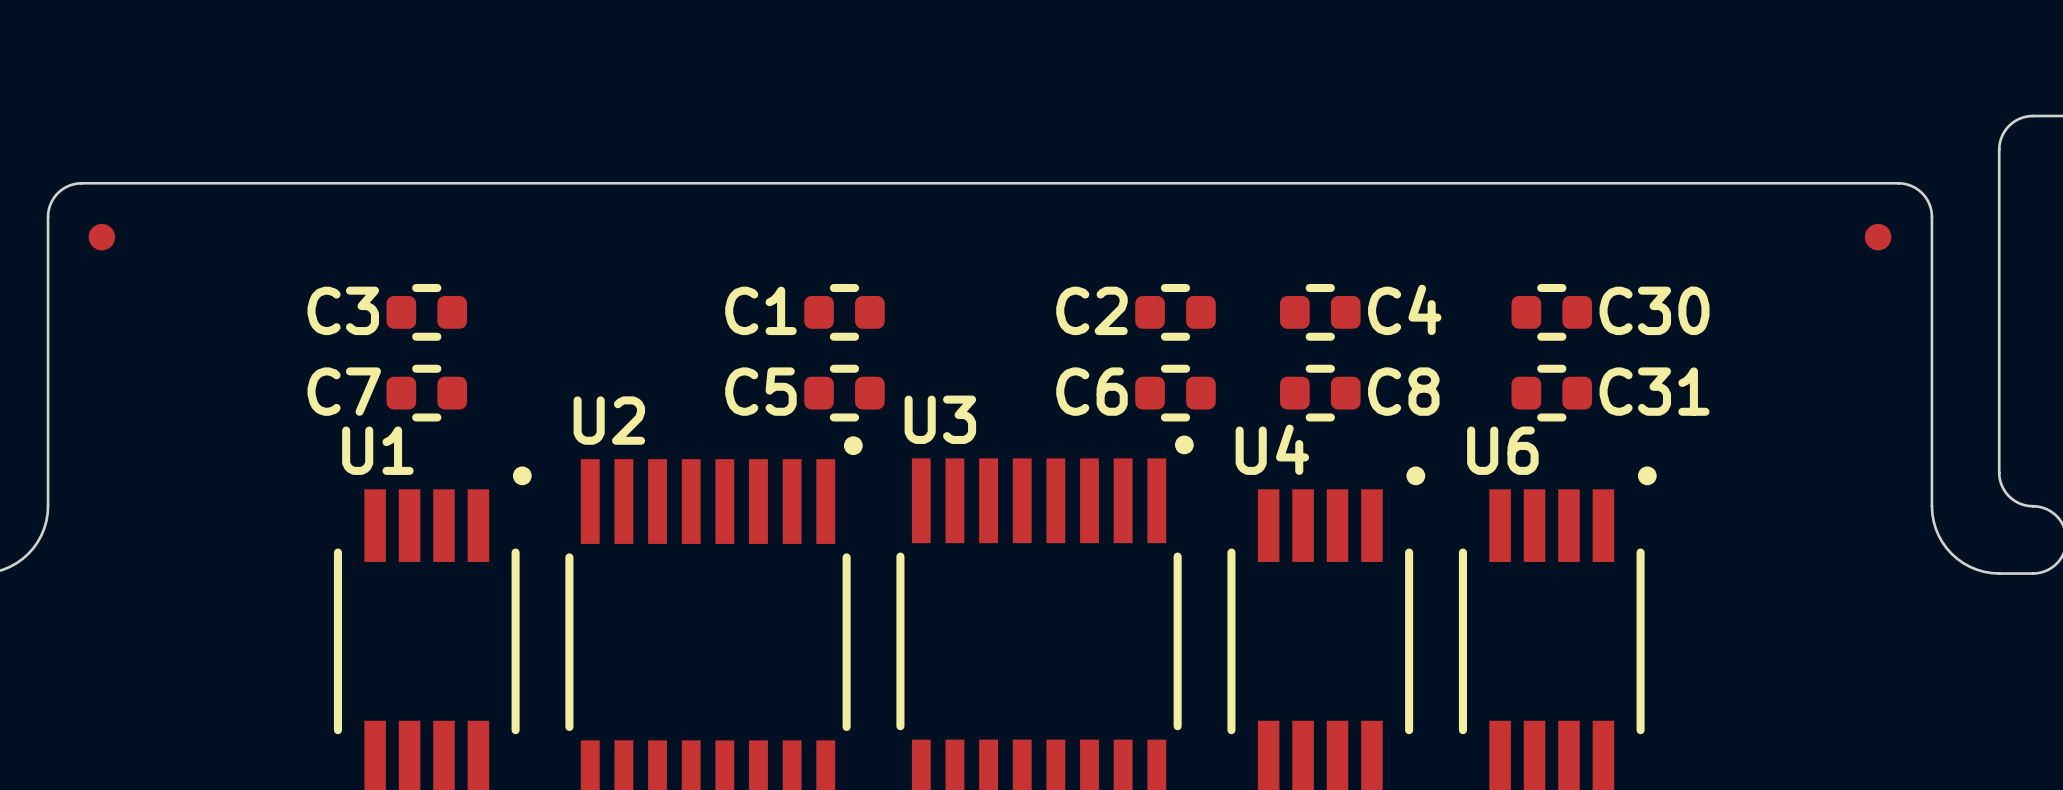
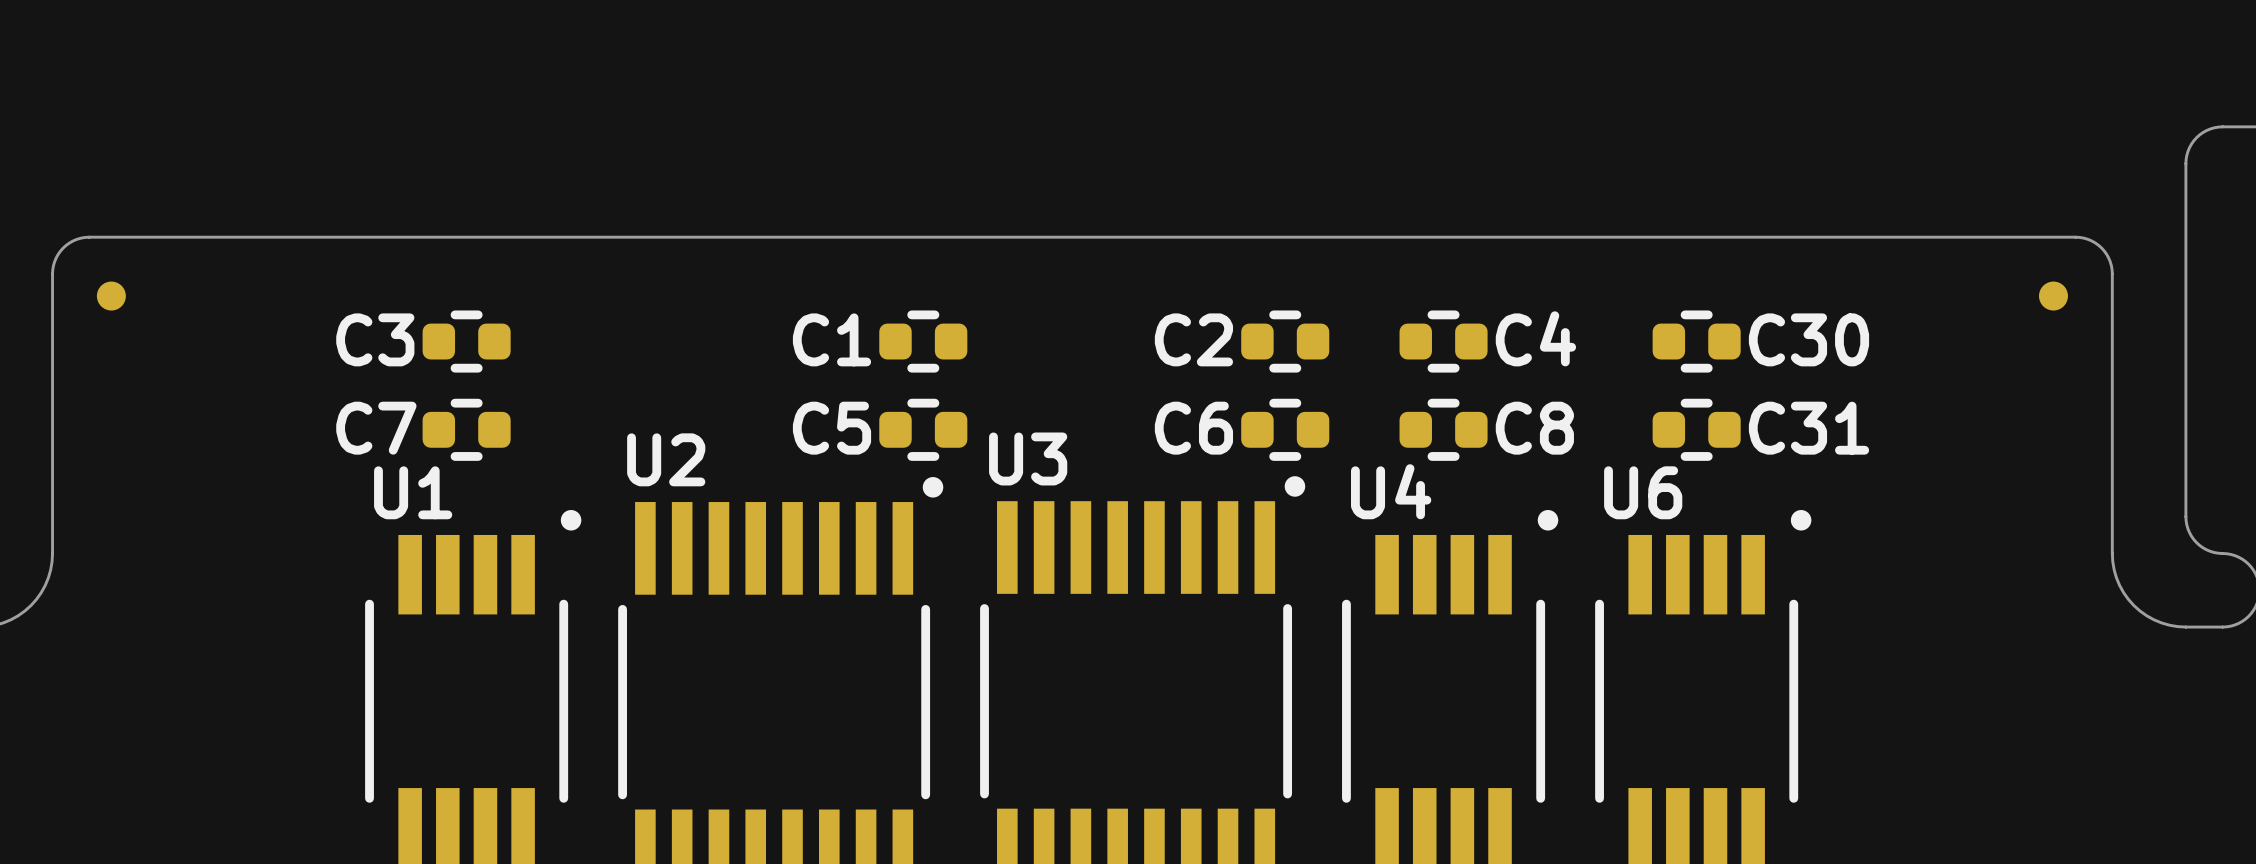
part position: (101, 237) -> (111, 296)
part position: (1878, 237) -> (2053, 296)
board edge: (48, 250) (48, 213) (51, 202) (63, 188) (81, 183) (1898, 183) (1916, 188) (1928, 202) (1931, 213) (1931, 250) -> (52, 273) (54, 261) (63, 247) (77, 239) (89, 237) (2075, 237) (2087, 239) (2101, 247) (2110, 261) (2112, 273)

